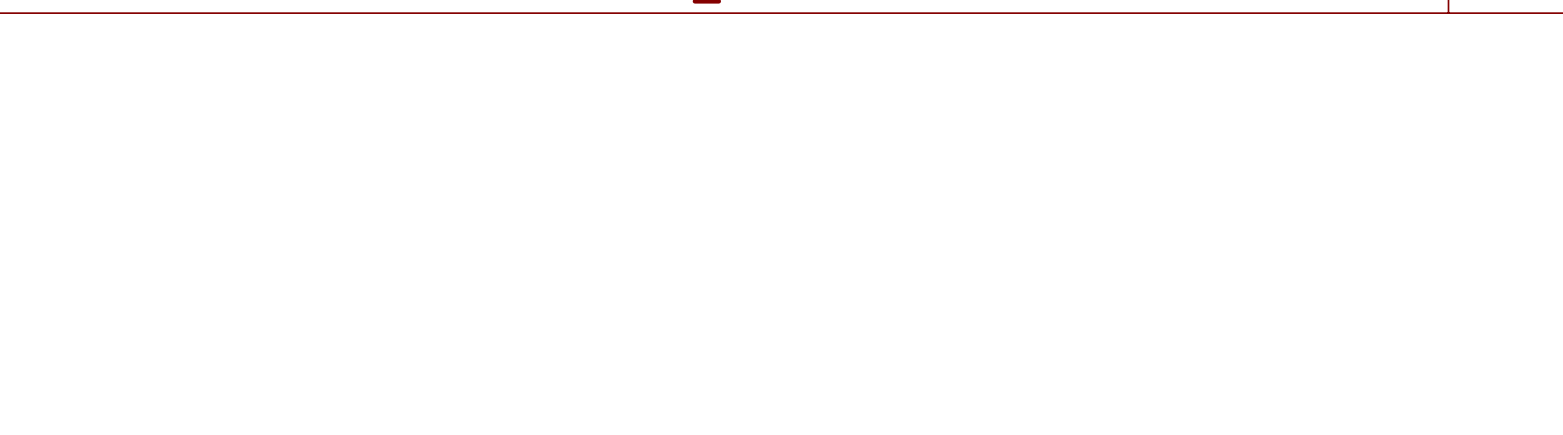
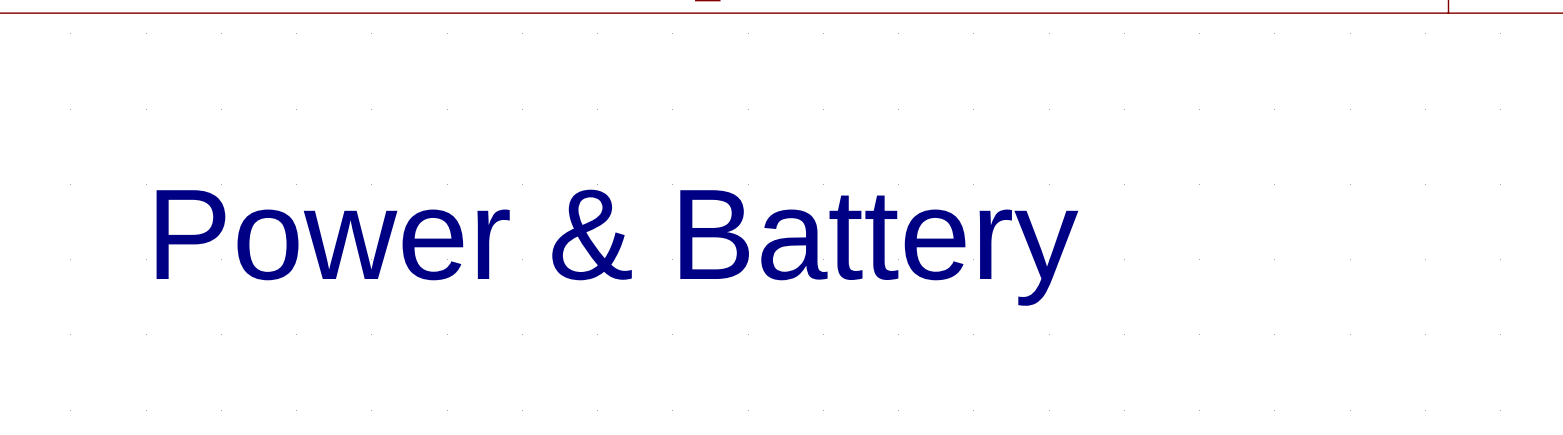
text: none -> Power & Battery (617, 247)

